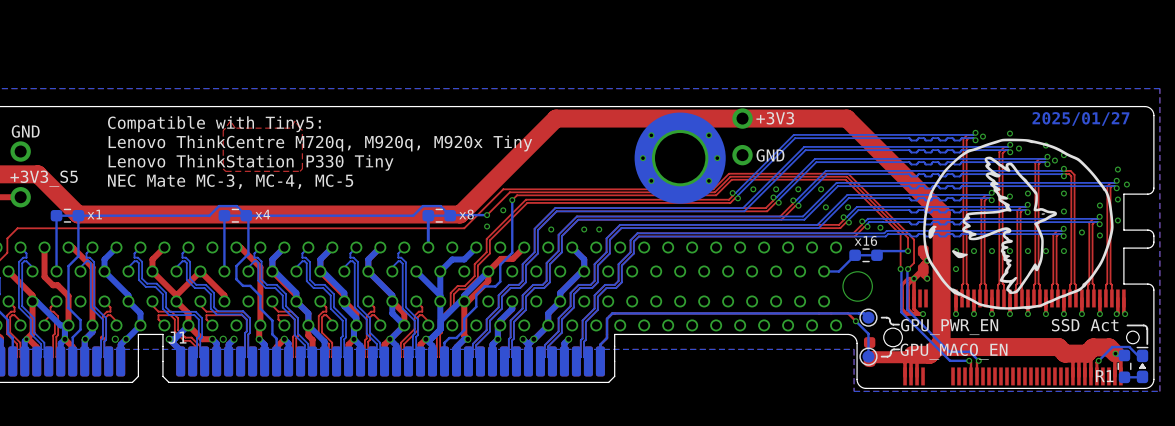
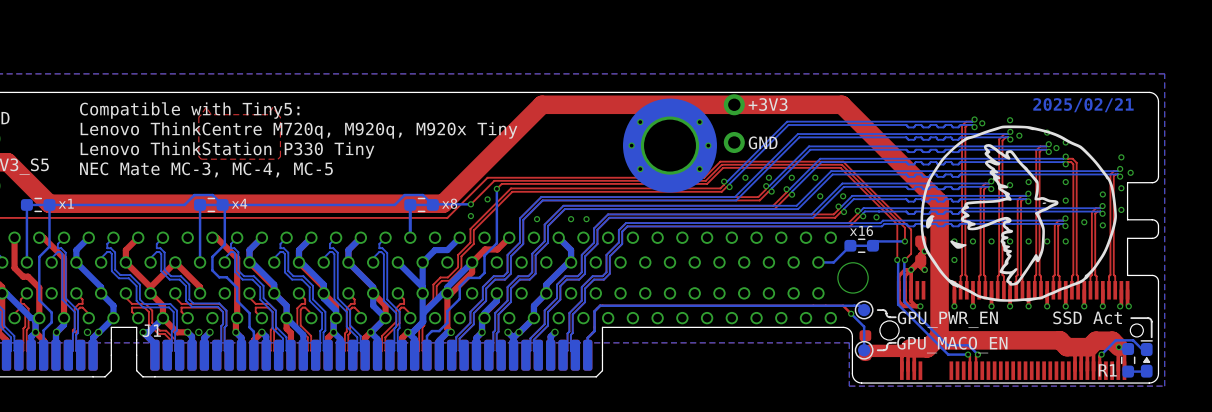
text: 2025/01/27 (1080, 118) -> 2025/02/21 (1083, 105)

